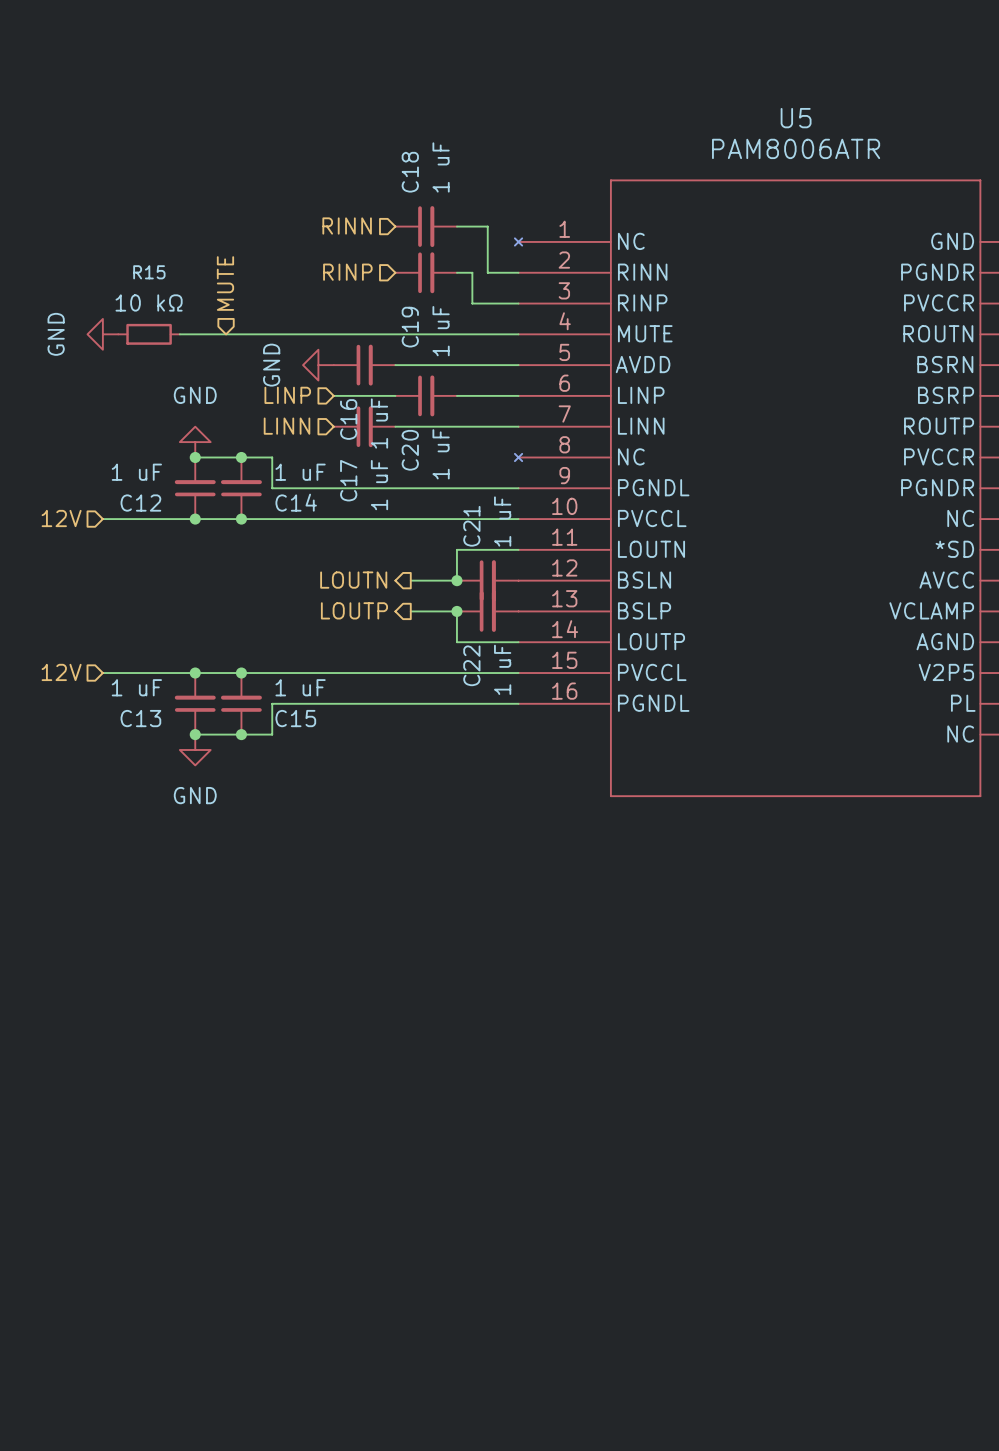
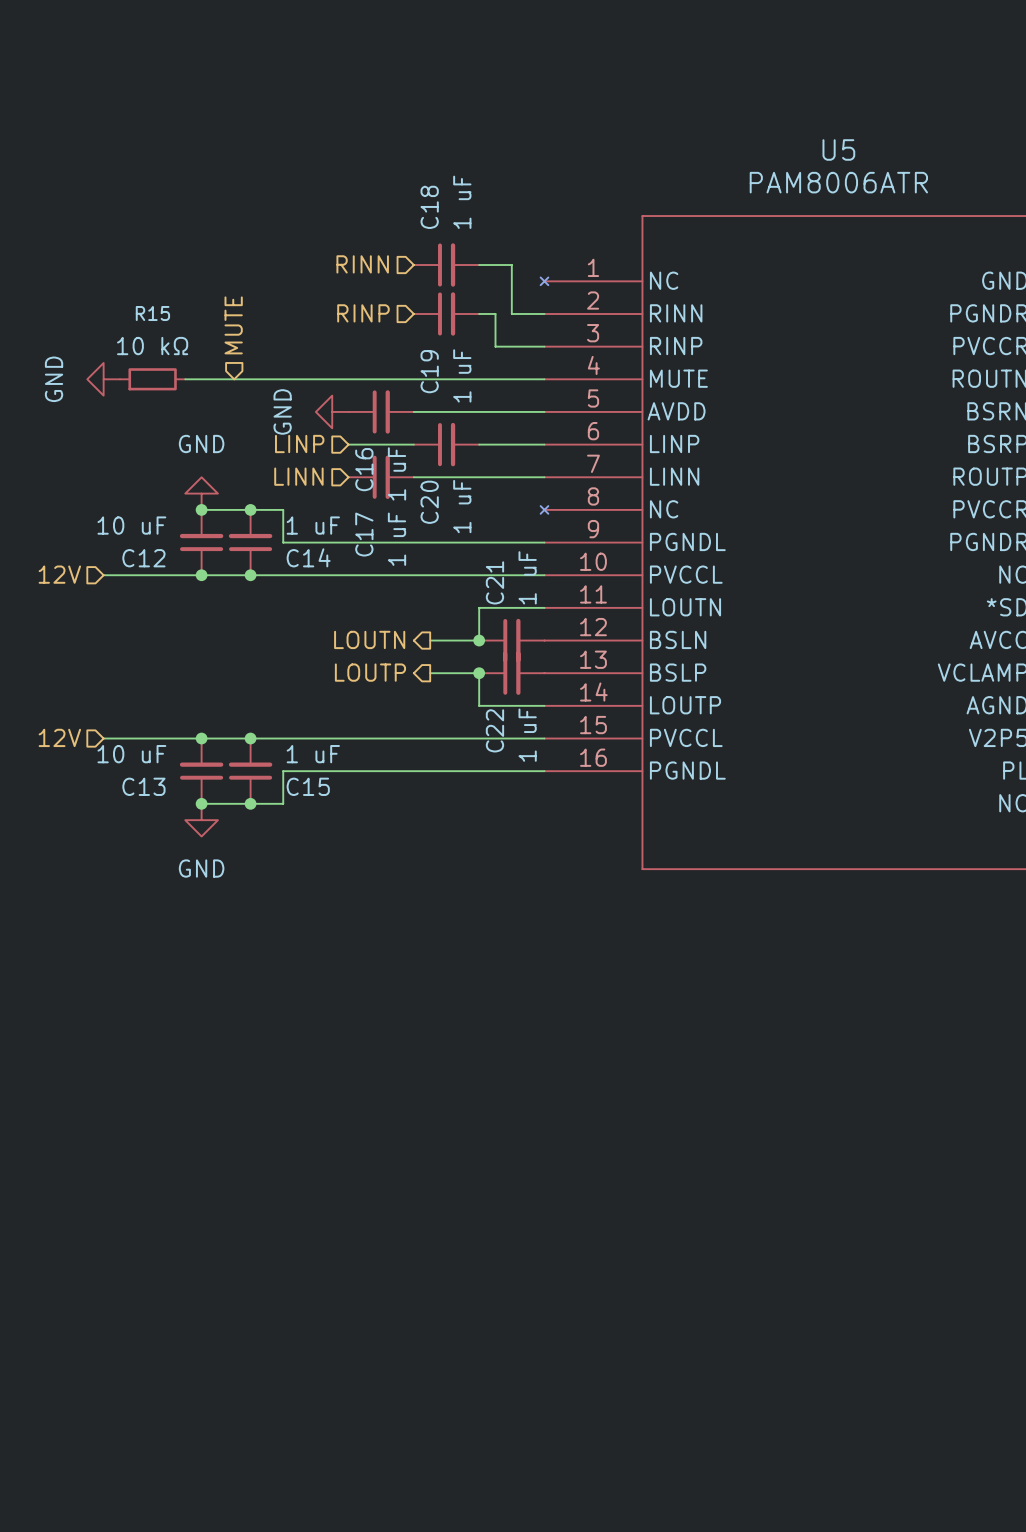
C12 value: 1 uF (136, 472) -> 10 uF (131, 525)
C13 value: 1 uF (136, 687) -> 10 uF (131, 754)

